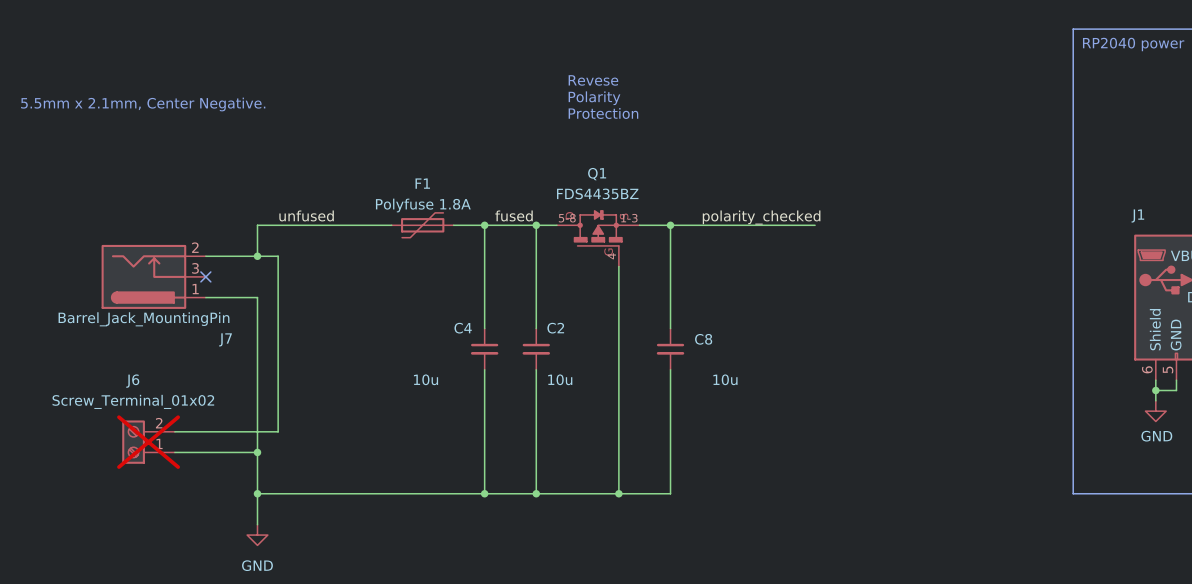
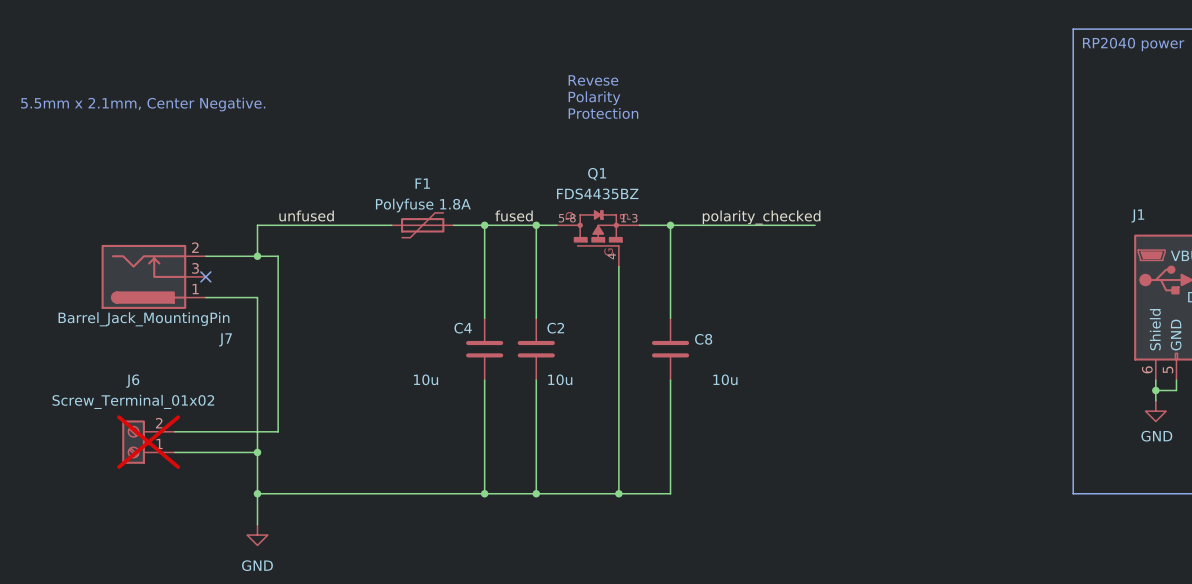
C4 symbol: [470, 328, 499, 370] -> [466, 318, 504, 381]
C2 symbol: [522, 328, 551, 370] -> [517, 318, 555, 381]
C8 symbol: [656, 328, 685, 370] -> [651, 318, 690, 381]

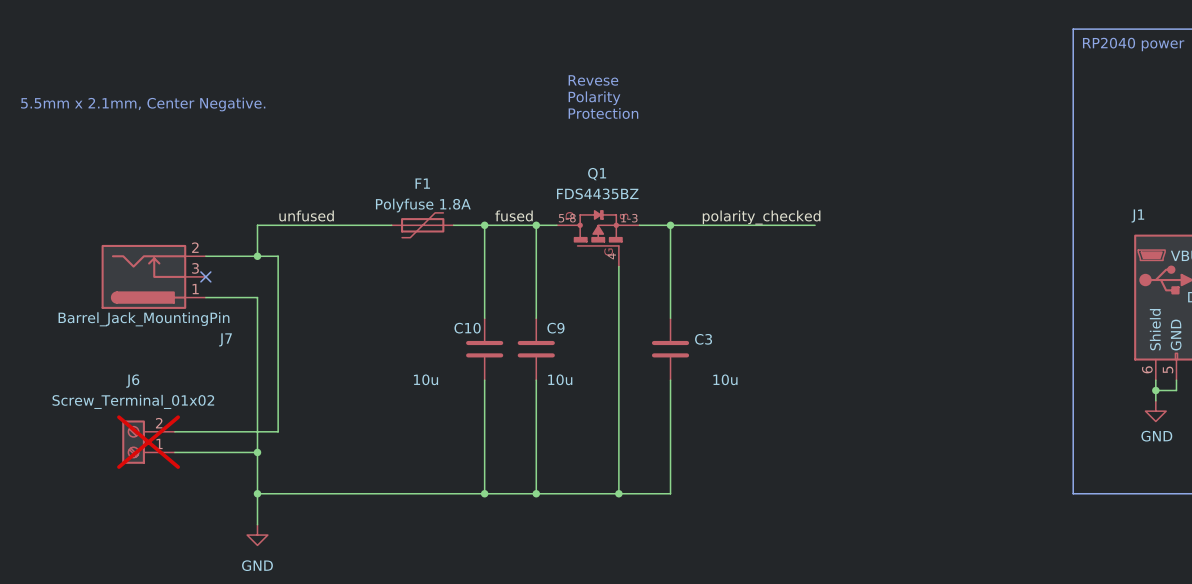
C4 name: C4 (463, 328) -> C10 (467, 328)
C2 name: C2 (555, 328) -> C9 (555, 328)
C8 name: C8 (703, 339) -> C3 (703, 339)

